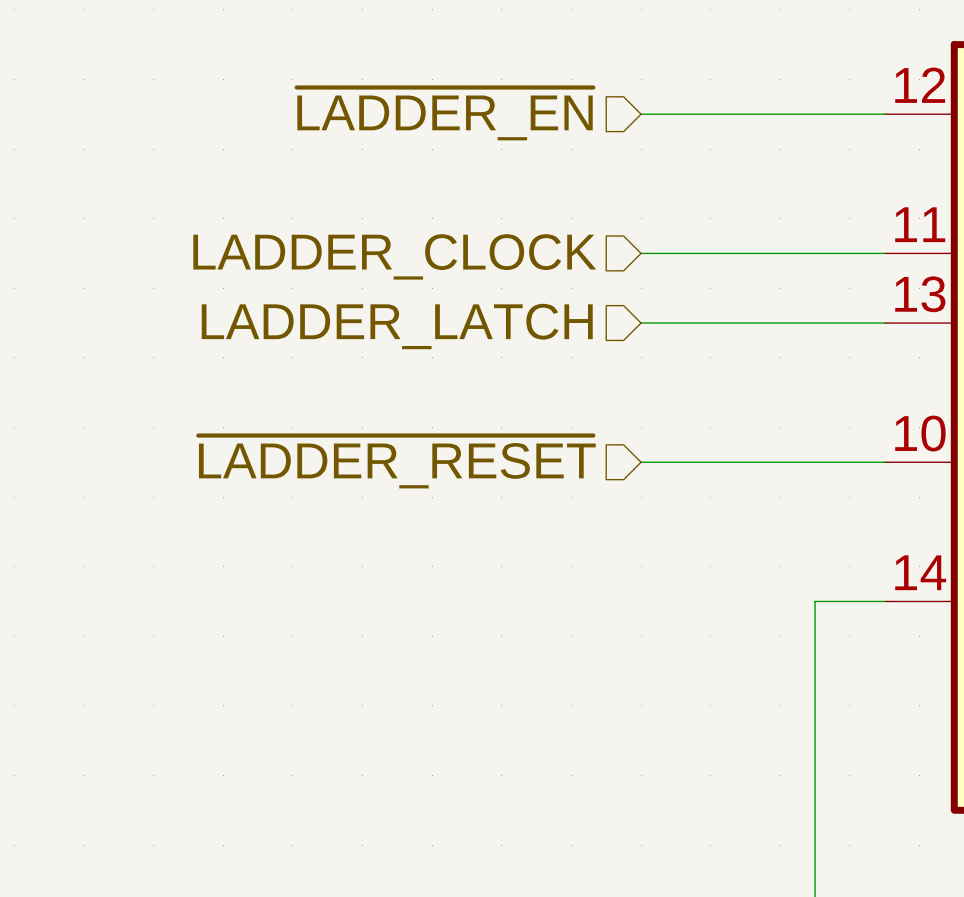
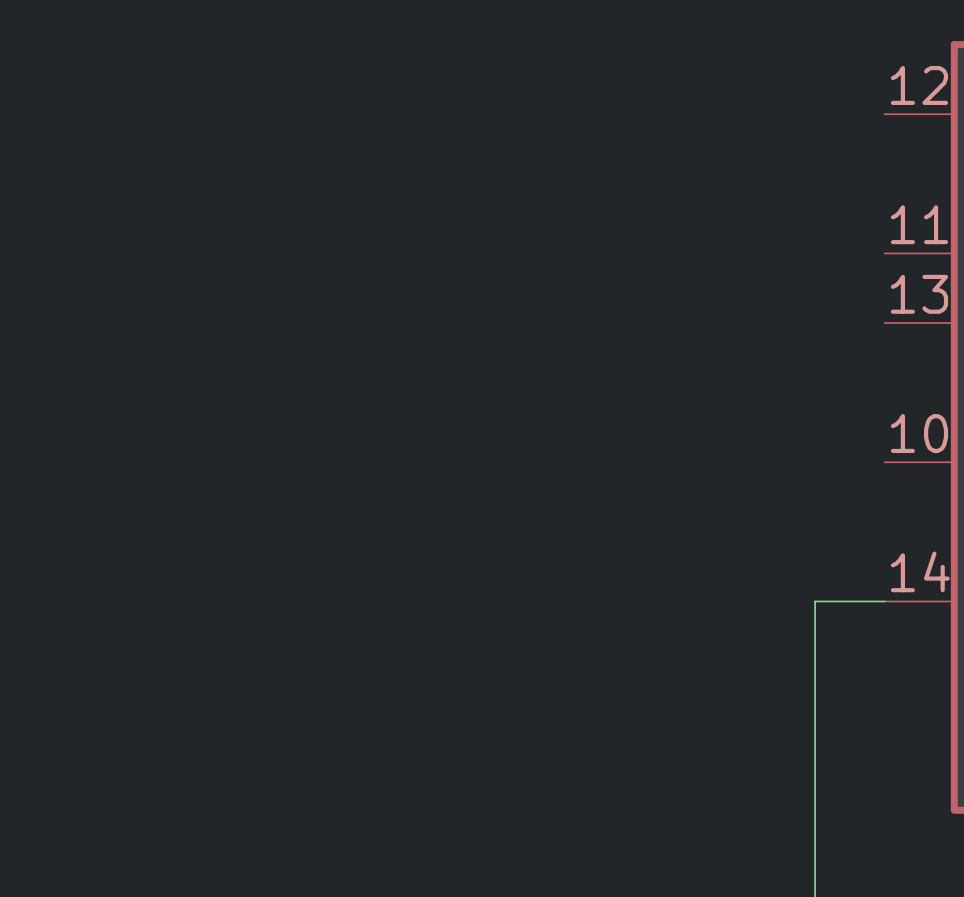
hierarchical label: ~{LADDER_EN} (445, 113) -> none
wire: (641, 114) (884, 114) -> none
wire: (641, 253) (884, 253) -> none
hierarchical label: LADDER_CLOCK (394, 256) -> none
wire: (641, 323) (884, 323) -> none
hierarchical label: LADDER_LATCH (397, 326) -> none
hierarchical label: ~{LADDER_RESET} (396, 461) -> none
wire: (641, 462) (884, 462) -> none

